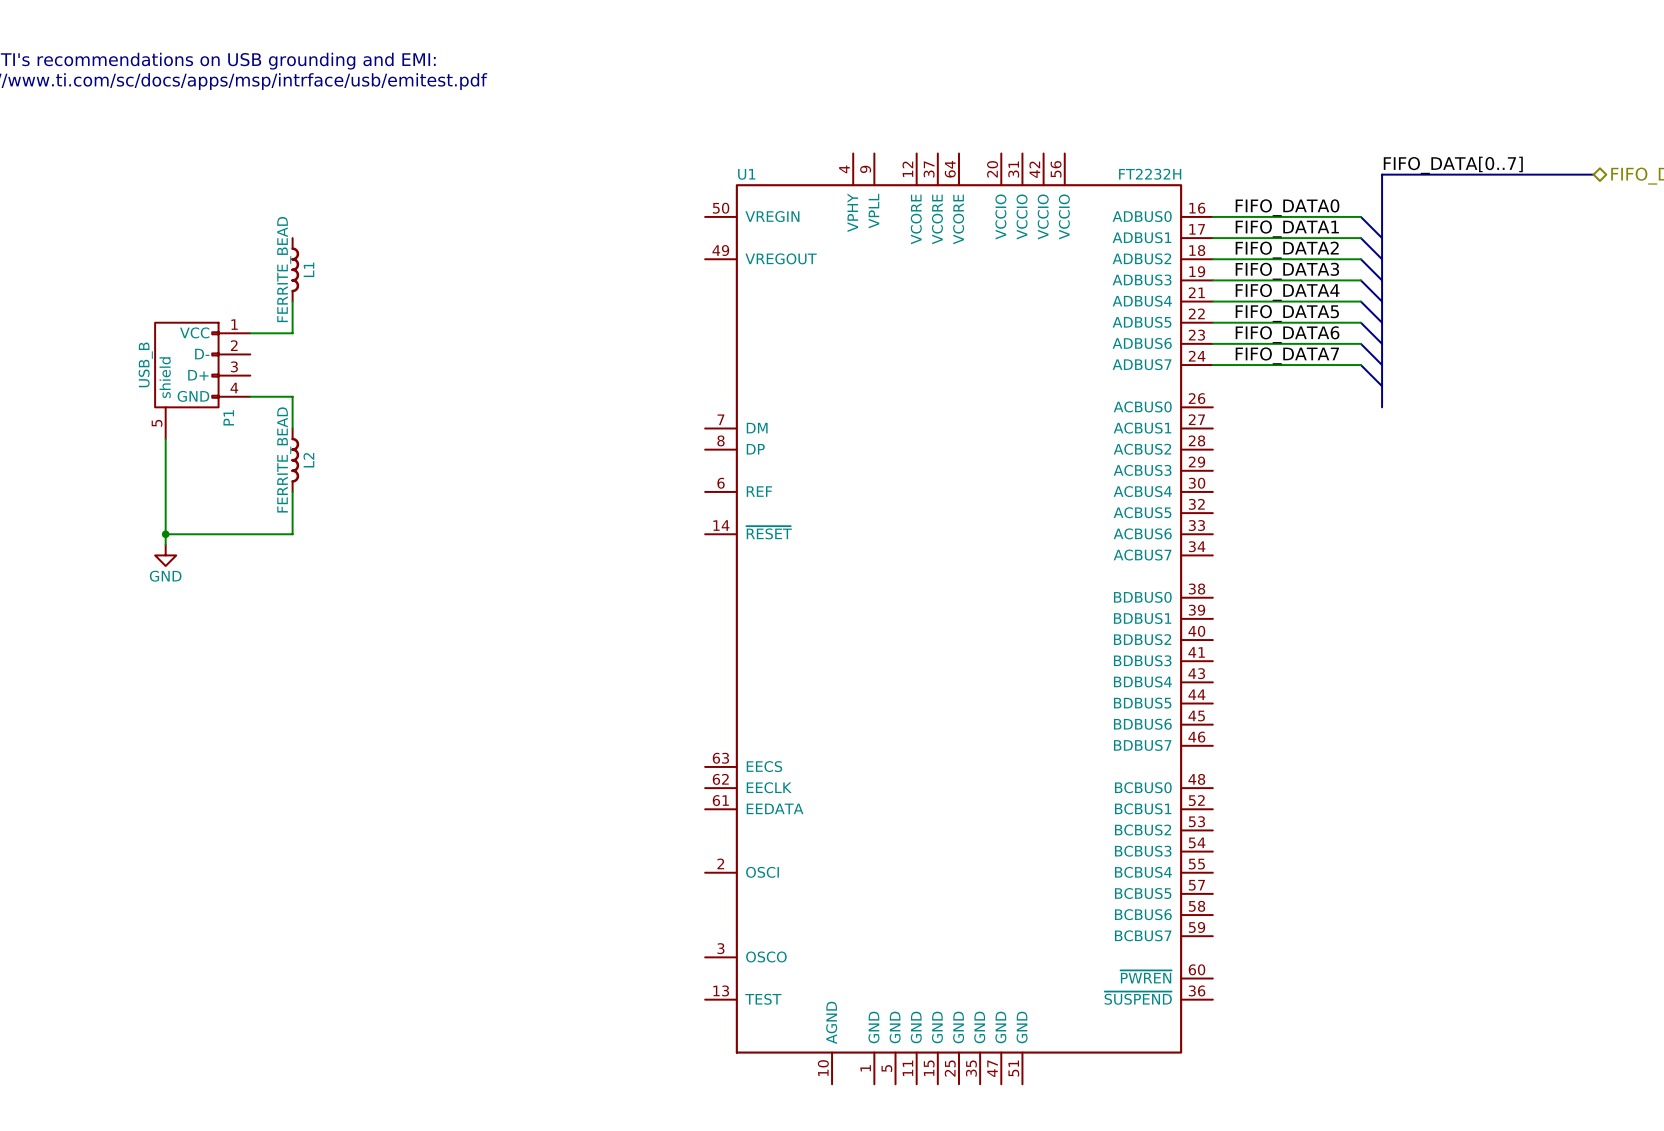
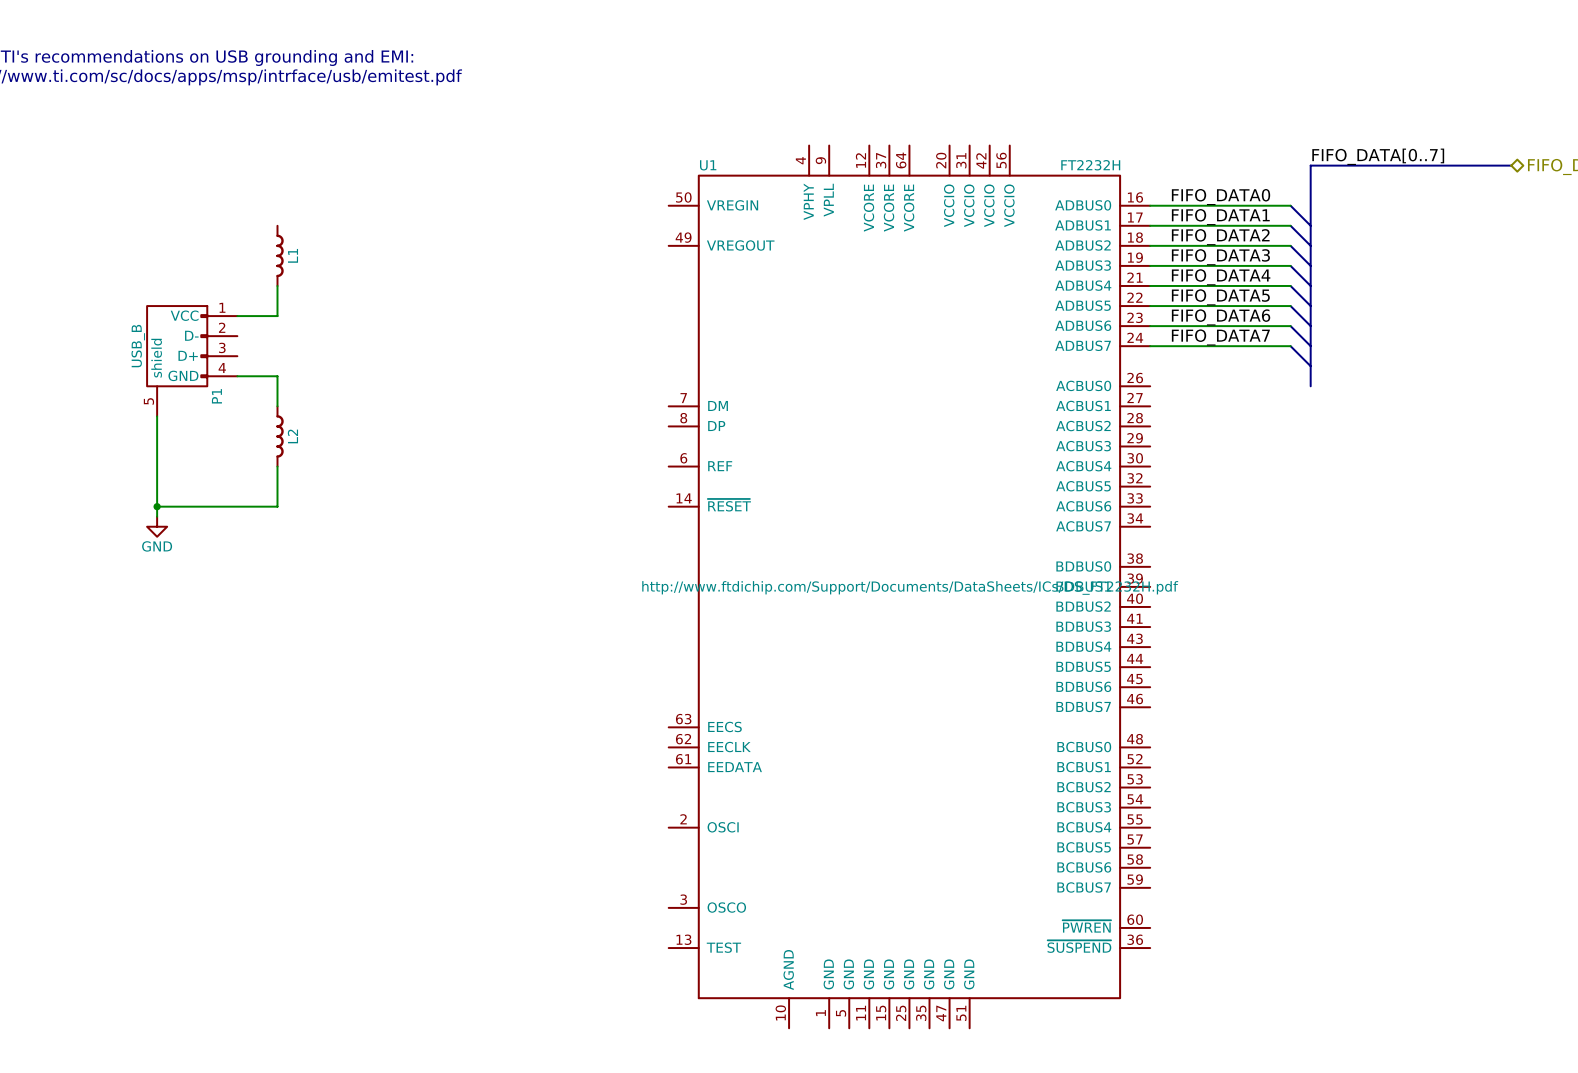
L1 value: FERRITE_BEAD (284, 269) -> none
L2 value: FERRITE_BEAD (284, 459) -> none
U1 text: none -> http://www.ftdichip.com/Support/Documents/DataSheets/ICs/DS_FT2232H.pdf (910, 587)

